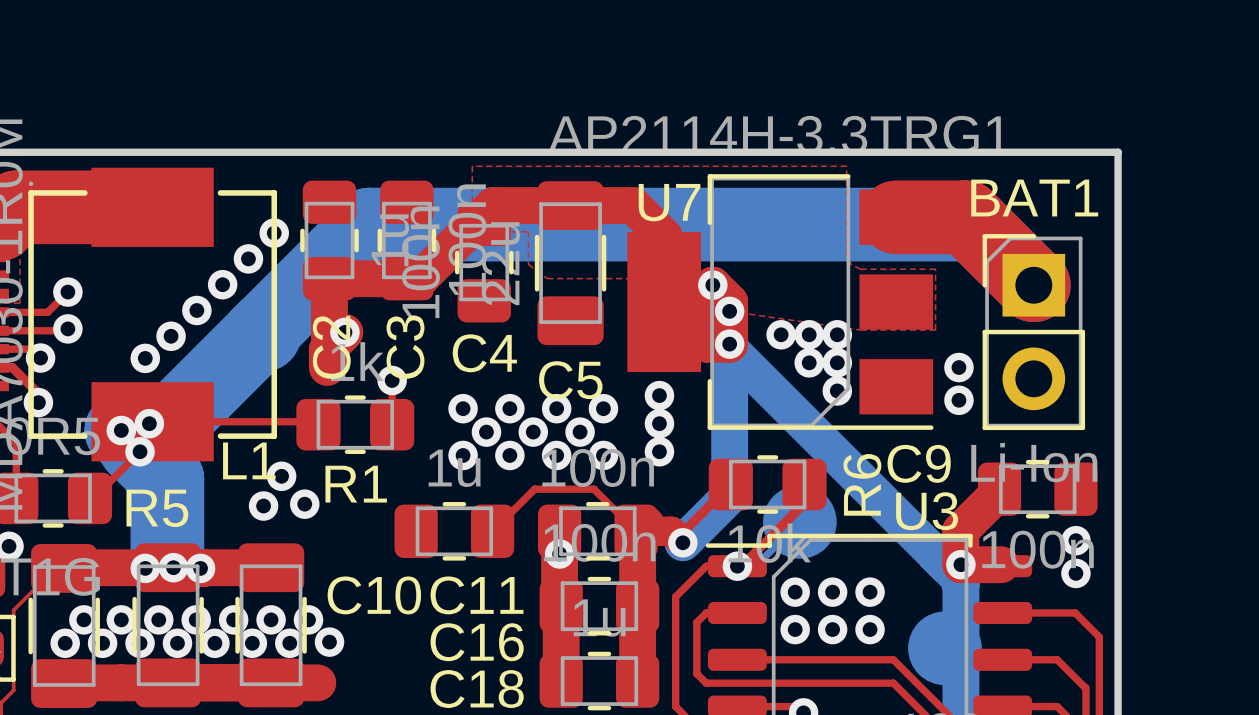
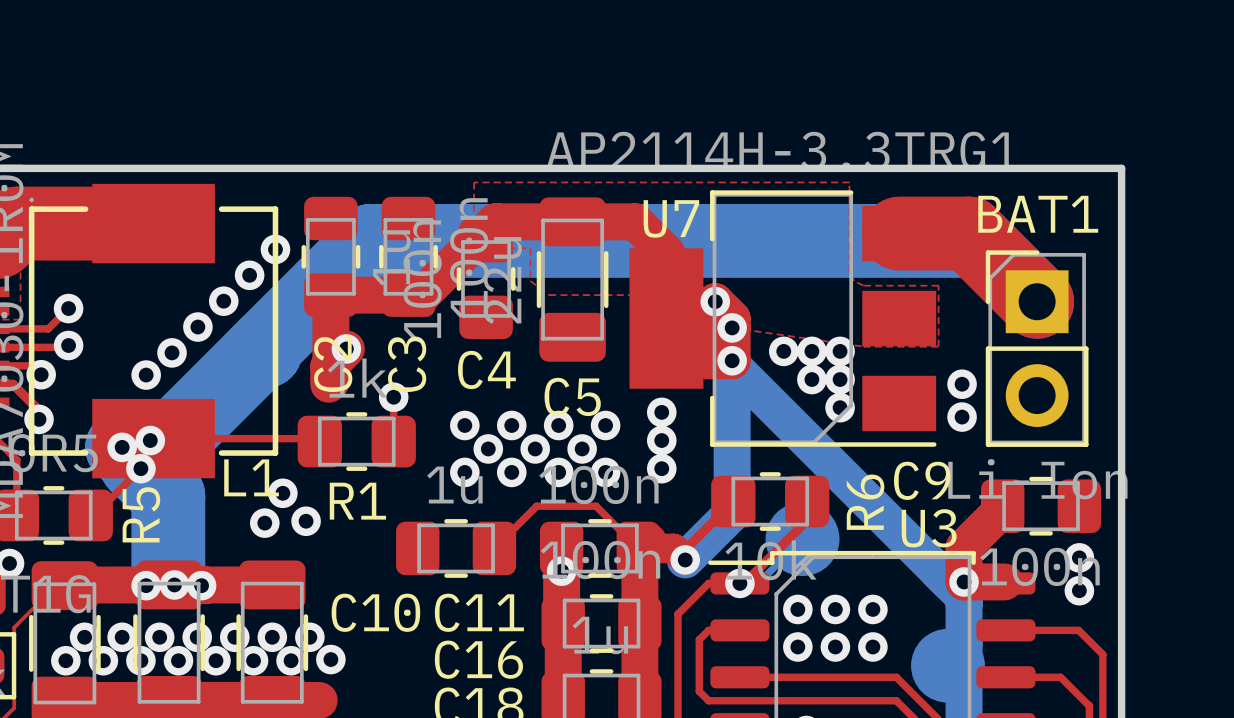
R5 name rotation: 0° (157, 508) -> 90° counterclockwise (141, 514)

